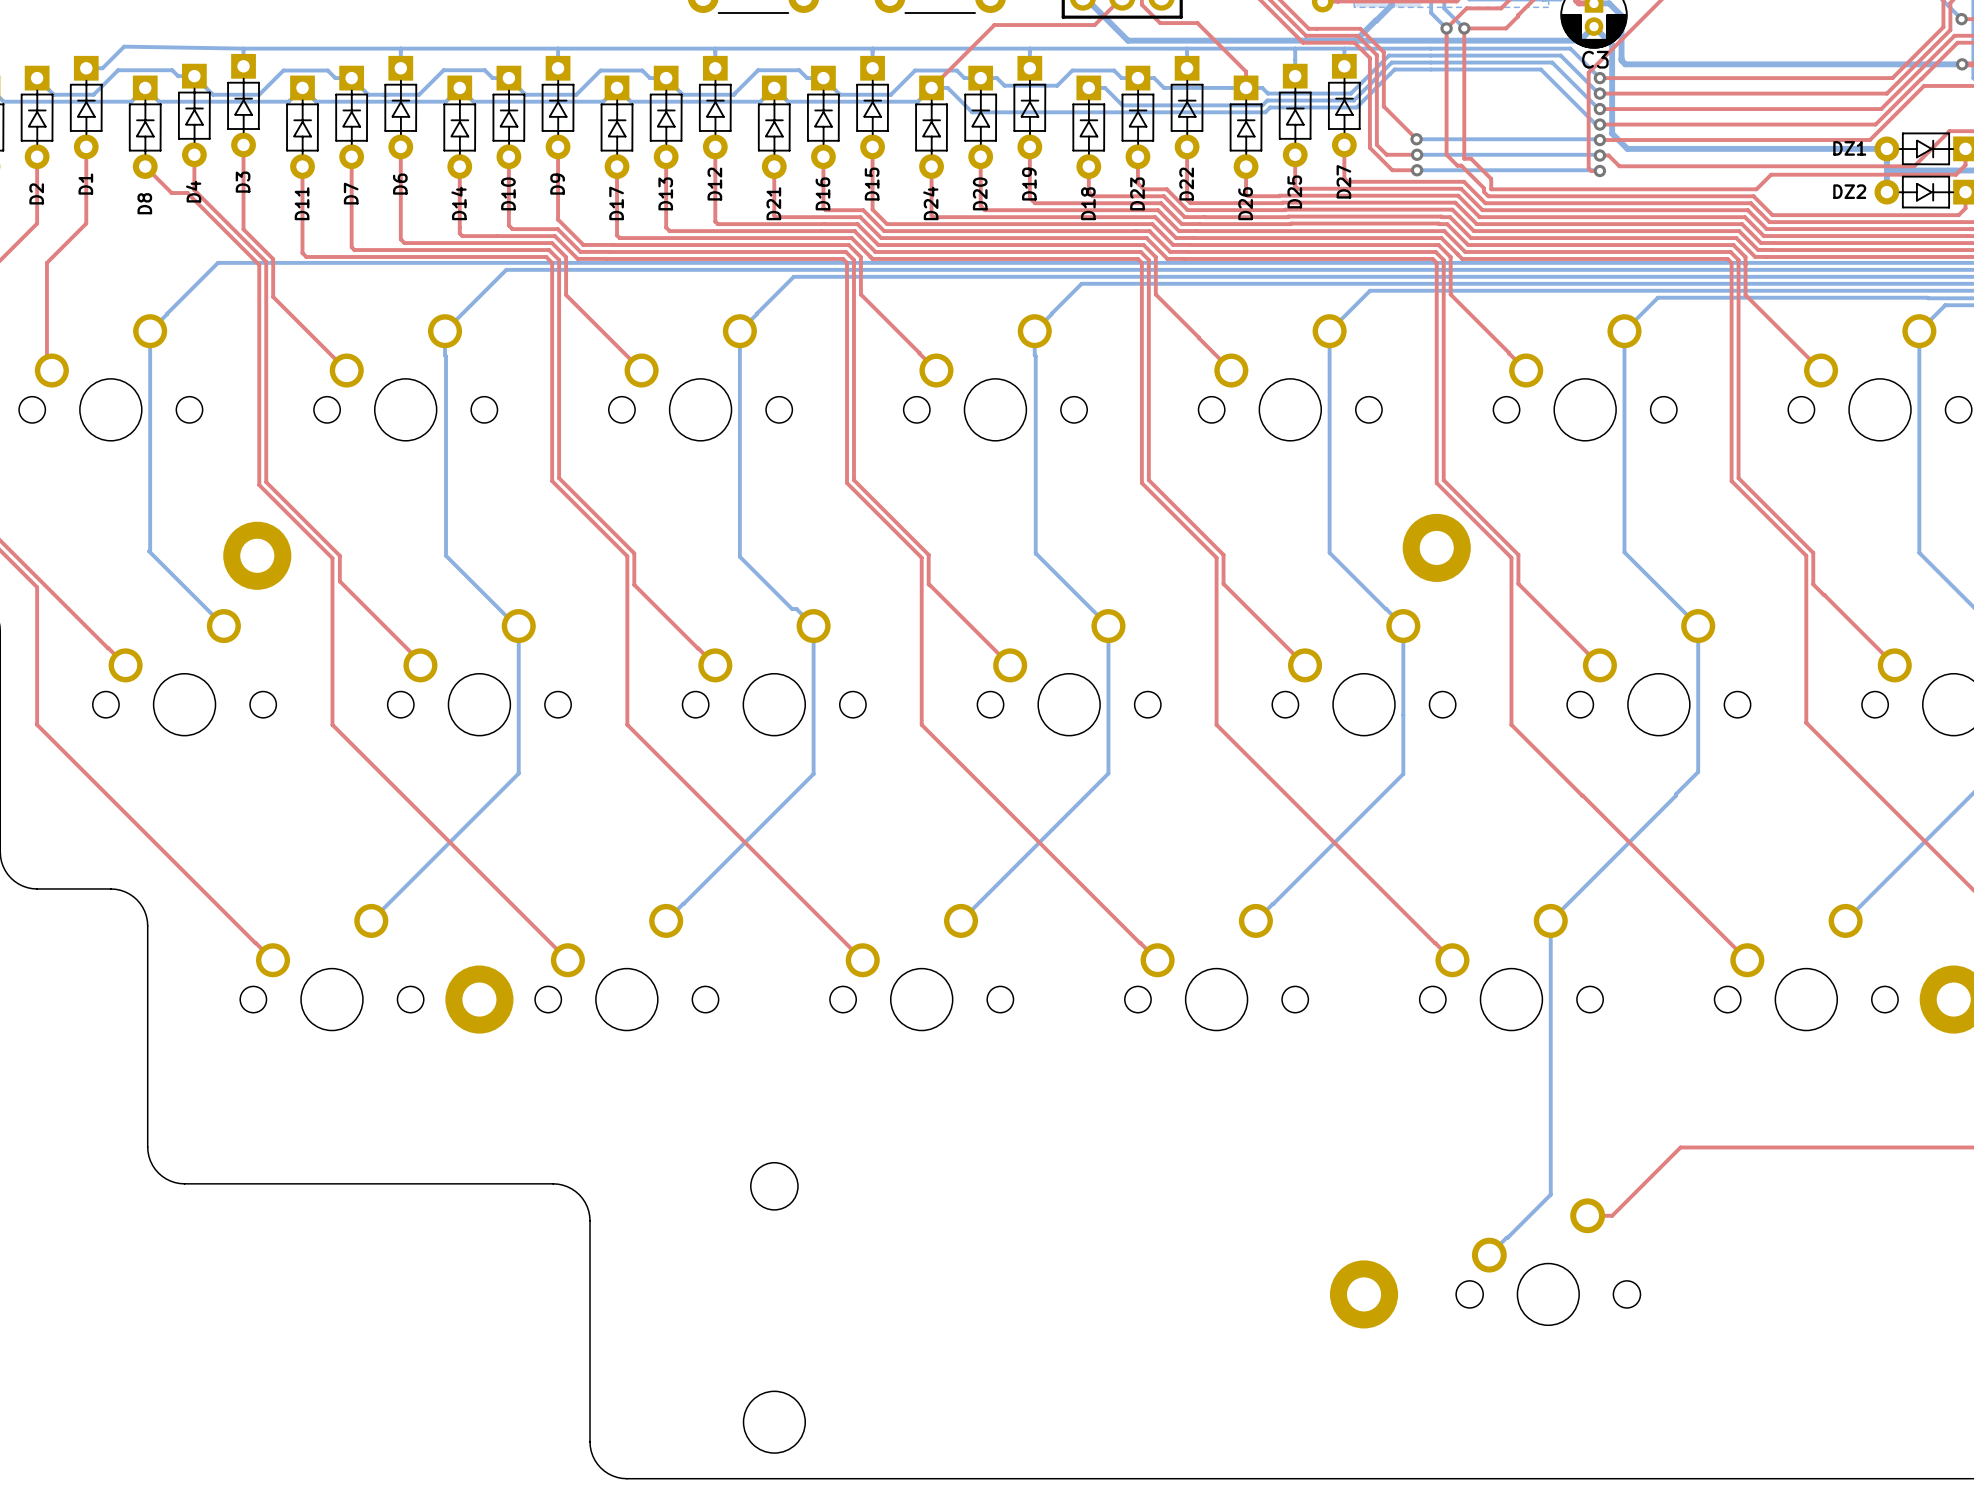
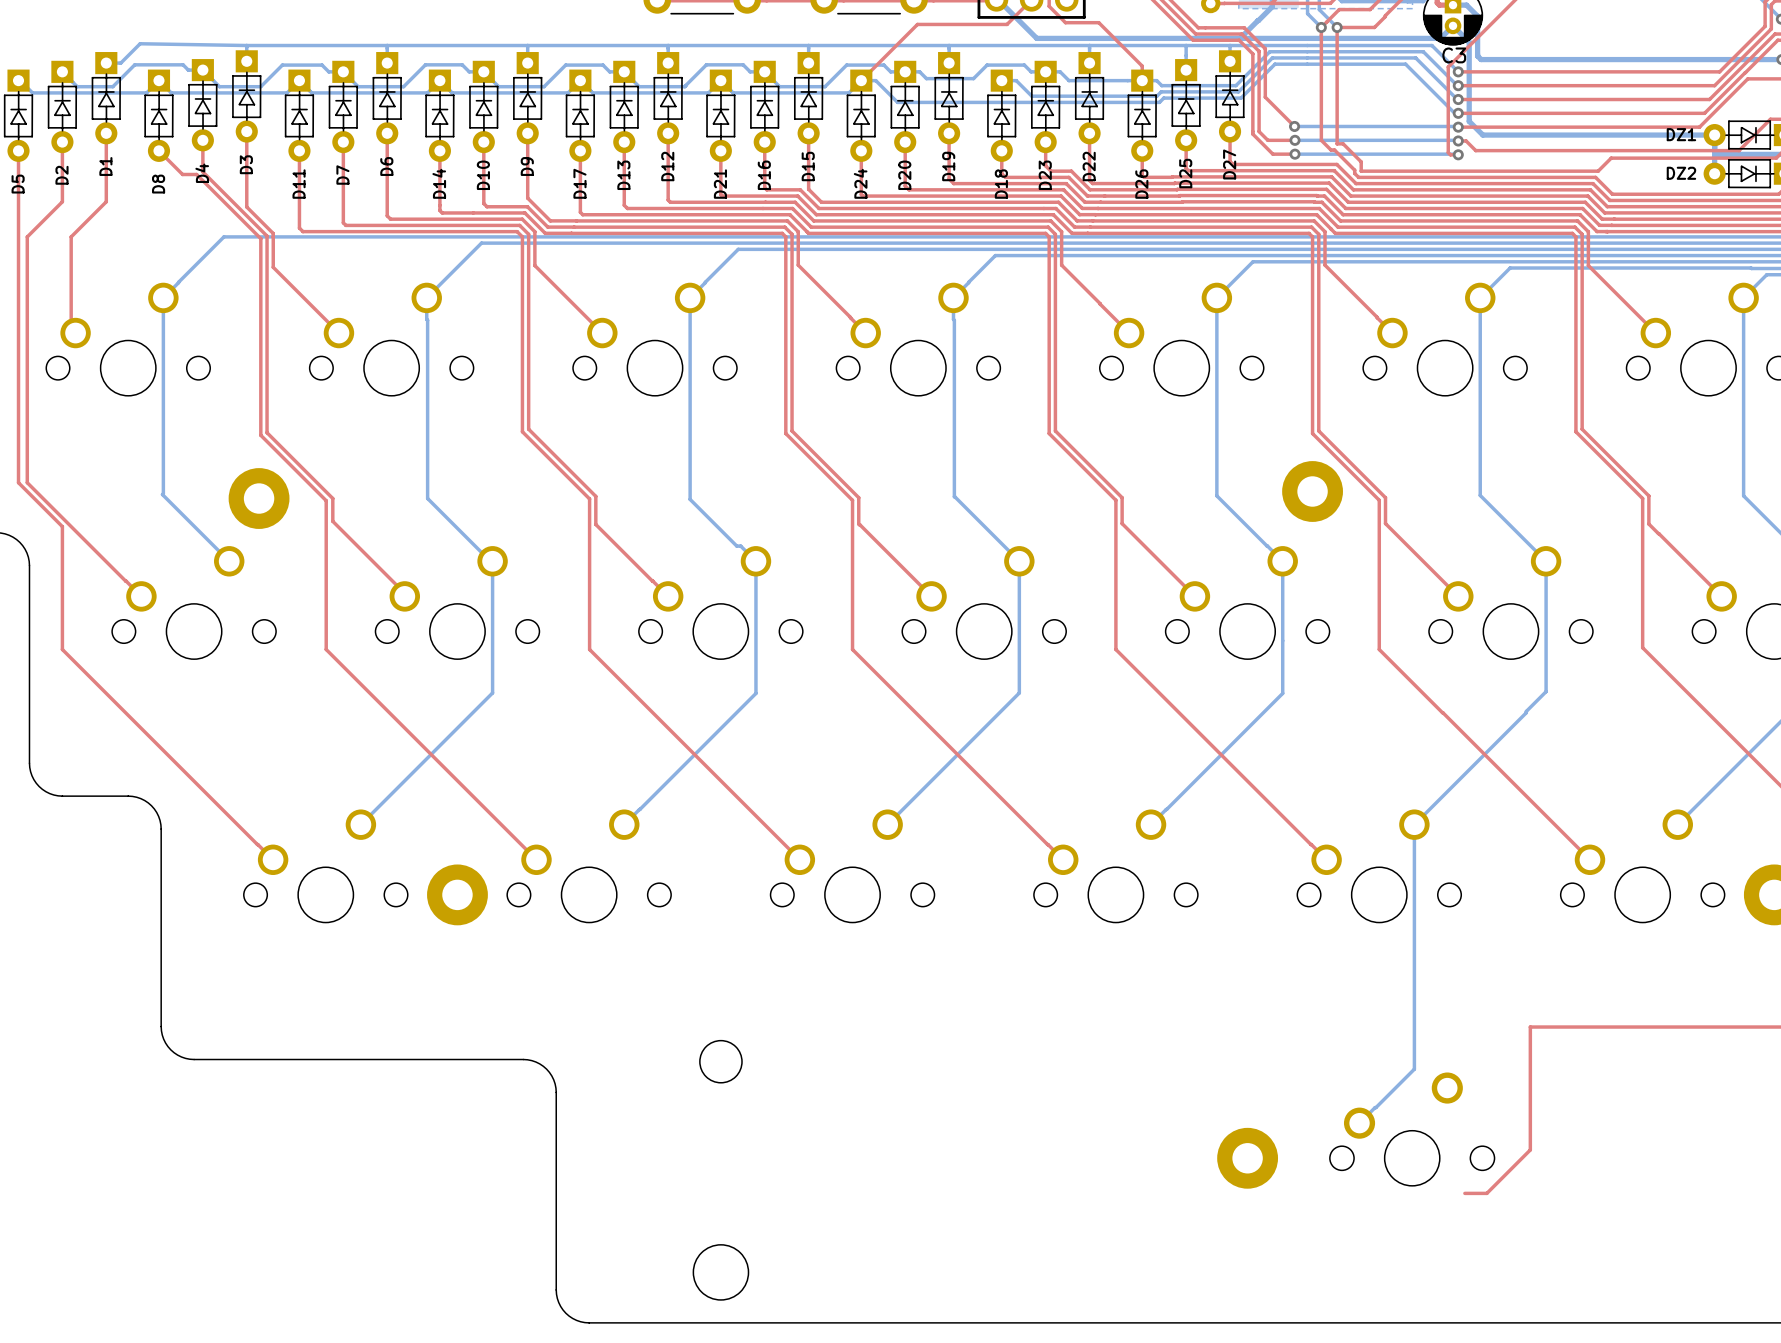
top track: (1680, 1147) (1612, 1215) (1587, 1215) -> (1530, 1027) (1530, 1149) (1486, 1193) (1464, 1193)

